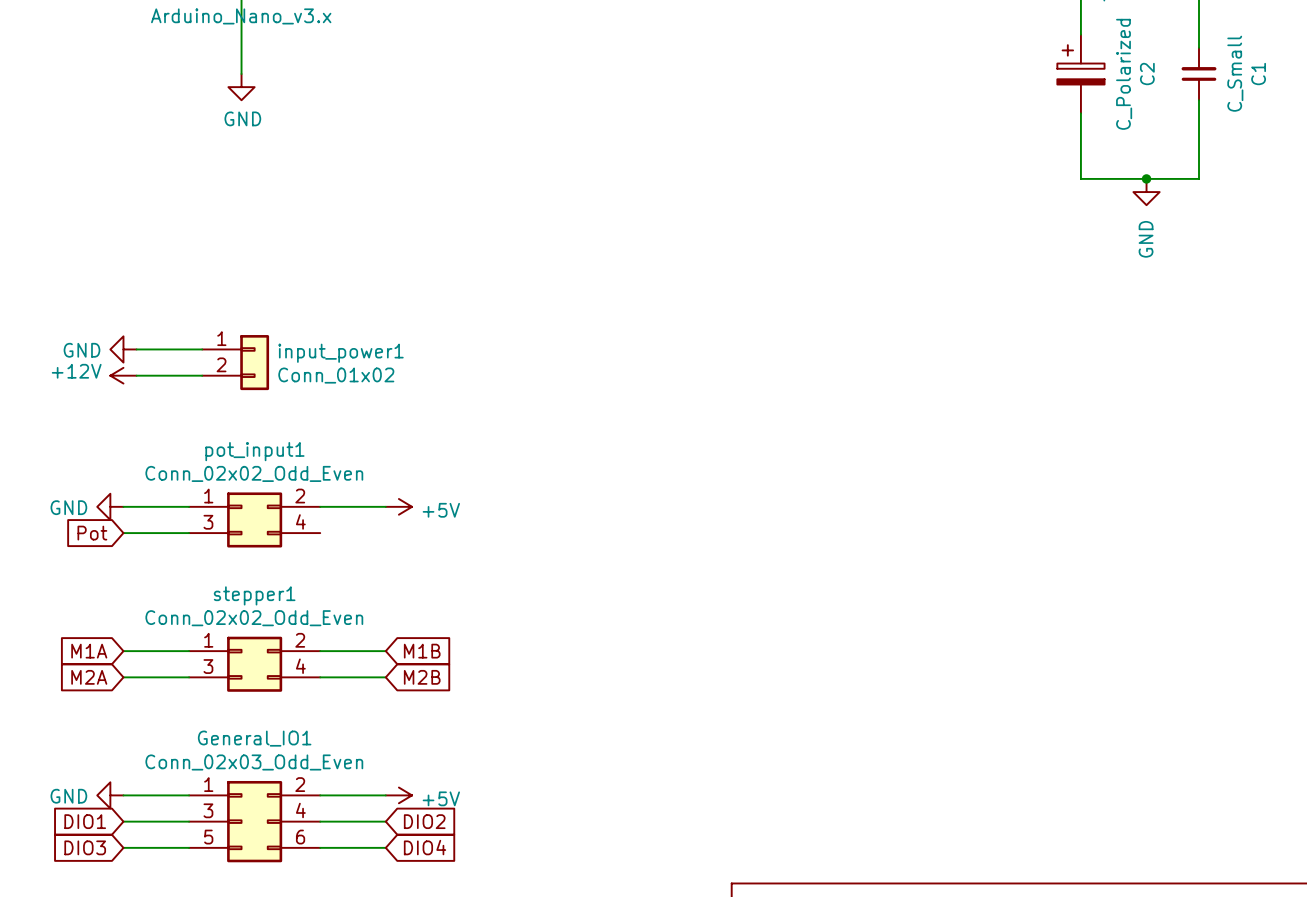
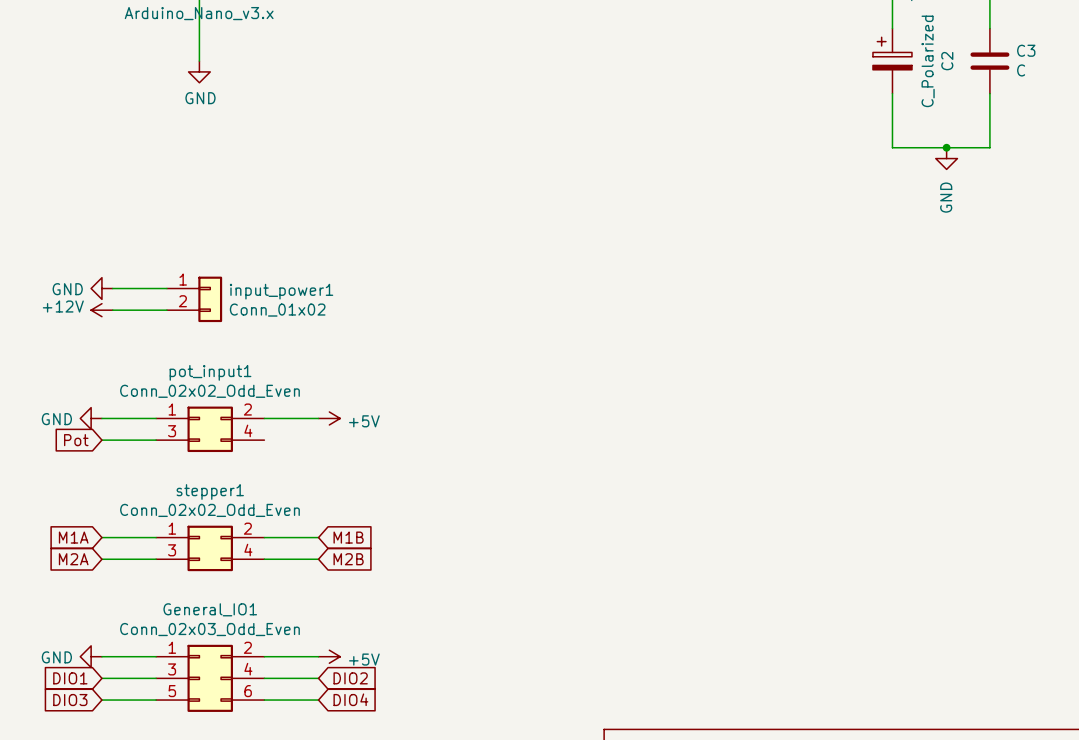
C1: C_Small (1199, 74) -> none
C3: none -> C (989, 61)

